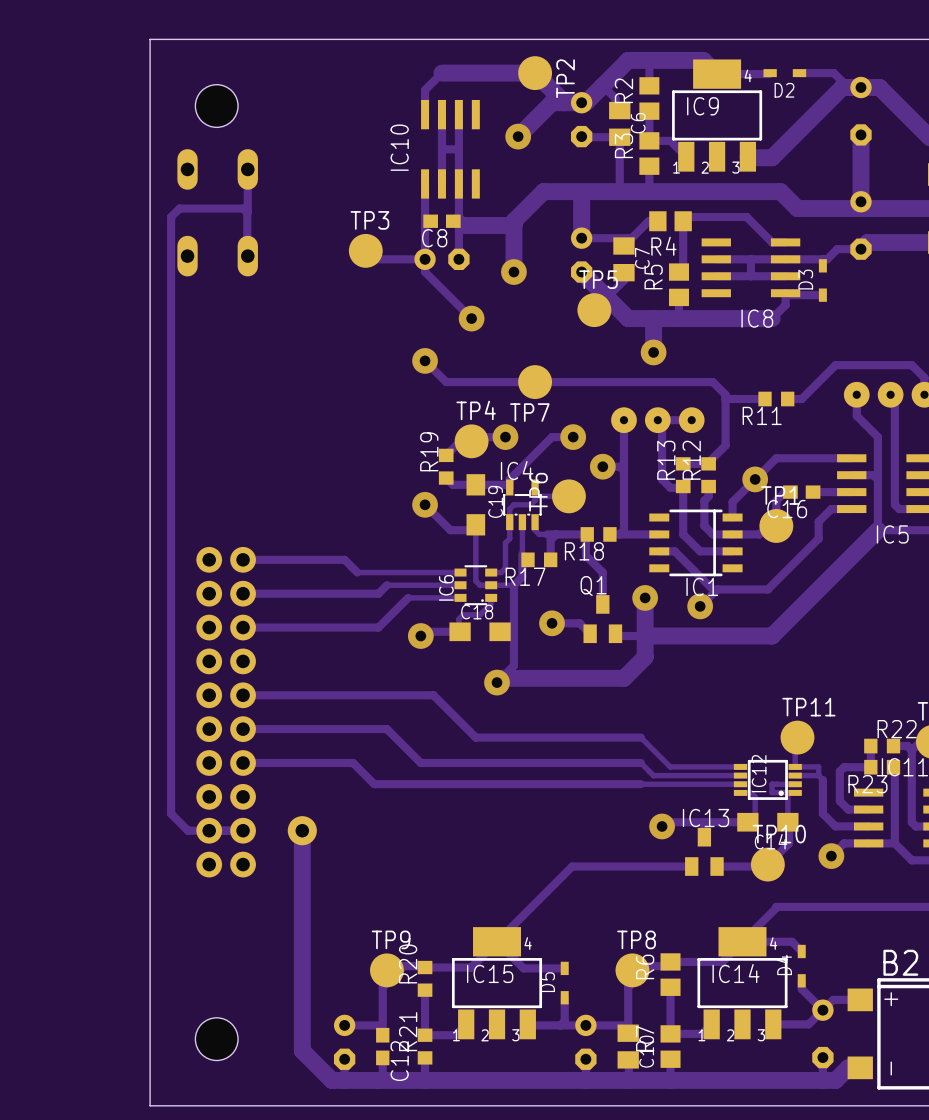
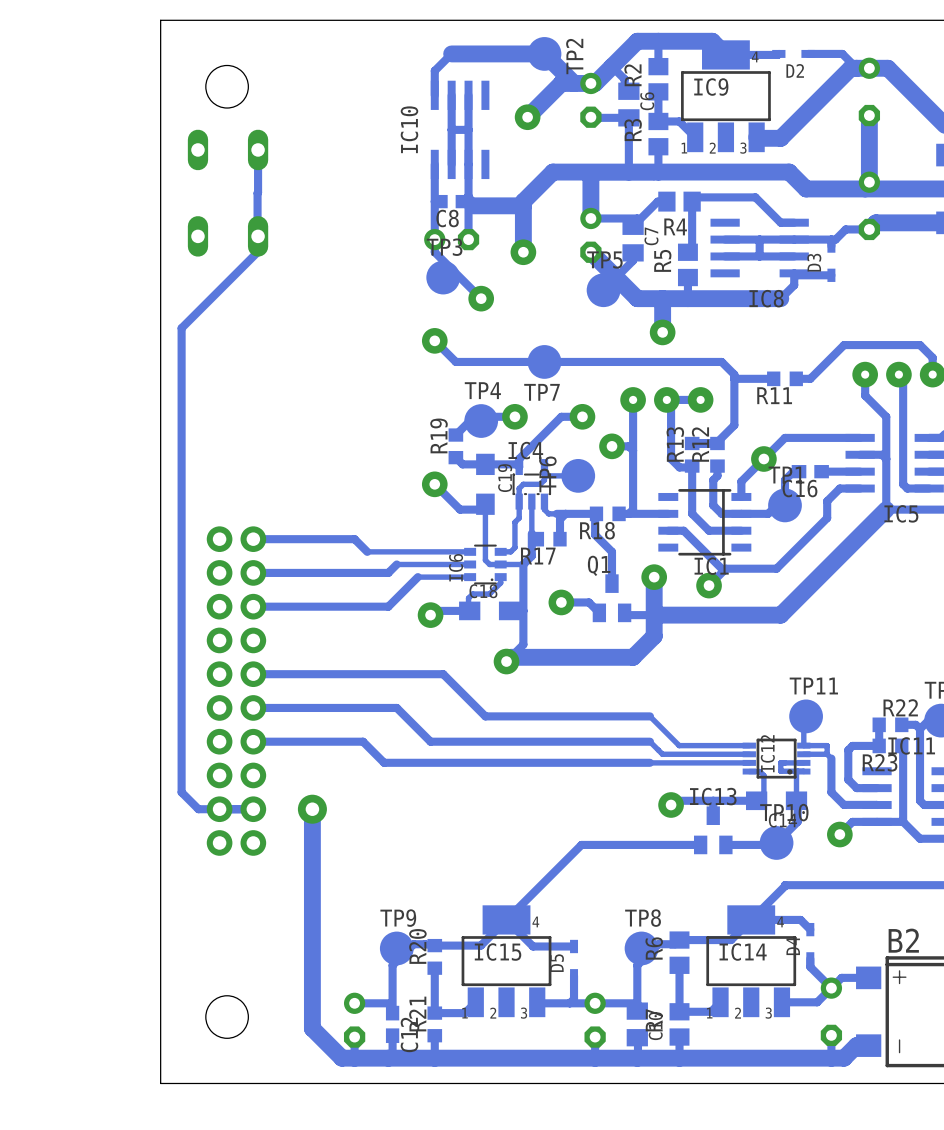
track: (247, 212) (243, 208) (179, 208) (171, 217) (171, 348) -> (258, 236) (258, 251) (181, 328)
track: (365, 250) (374, 259) (425, 259) -> none
TP3 position: (365, 250) -> (443, 277)

